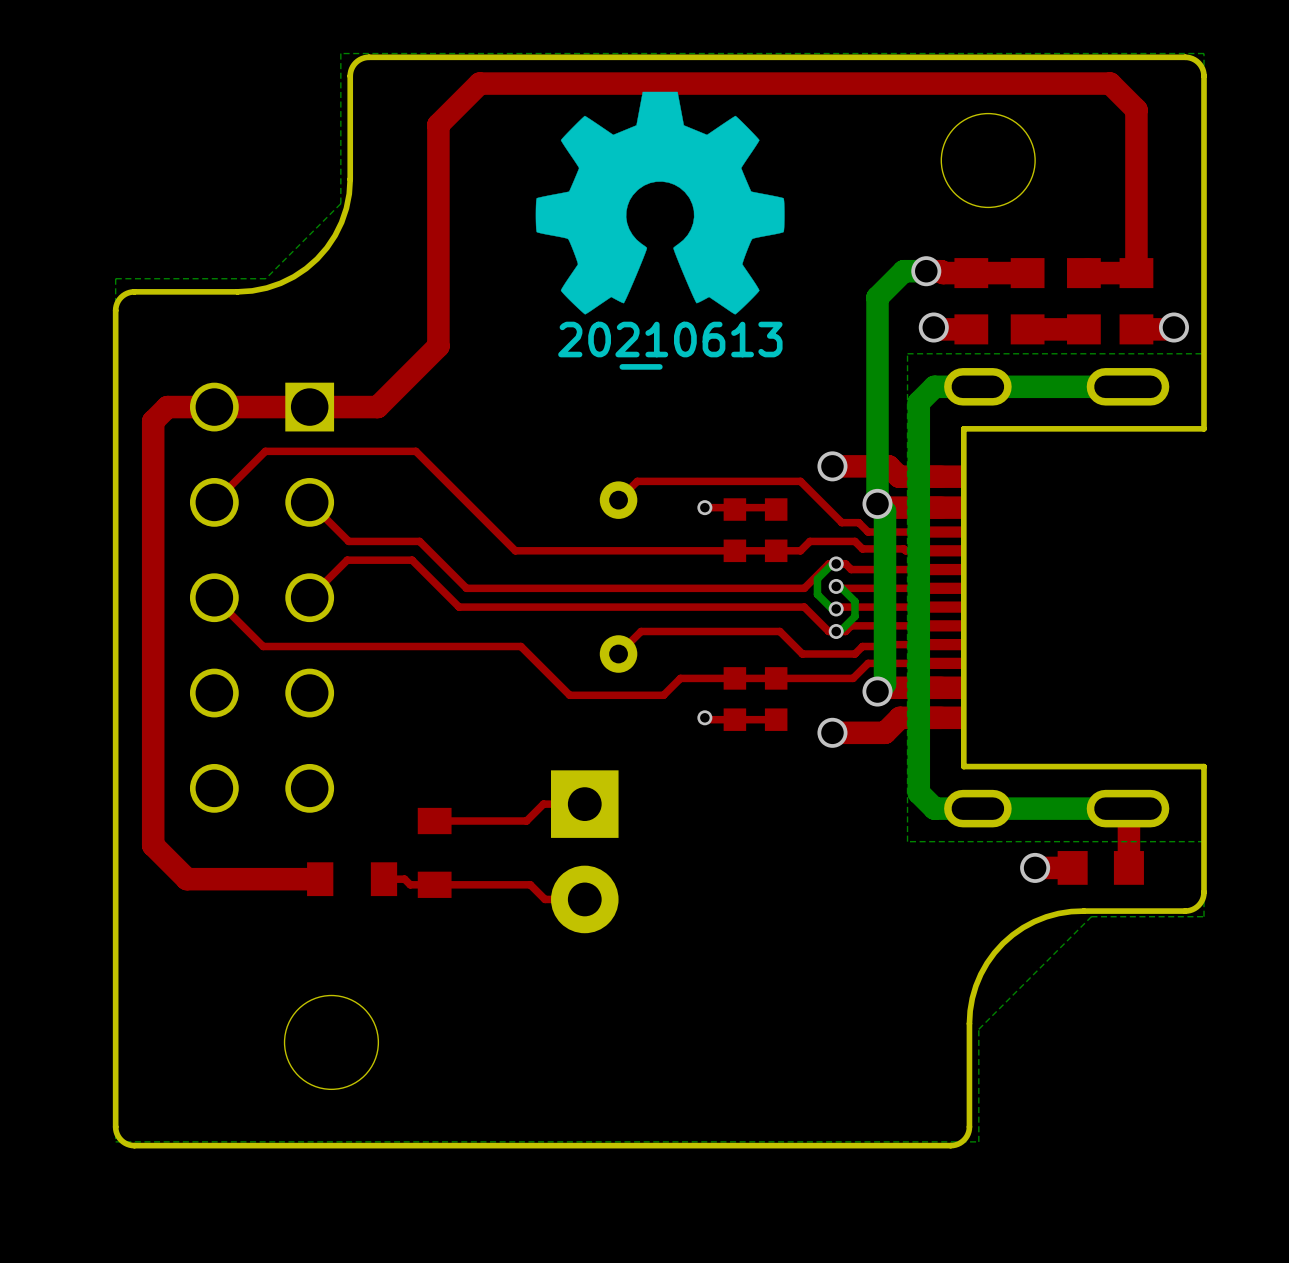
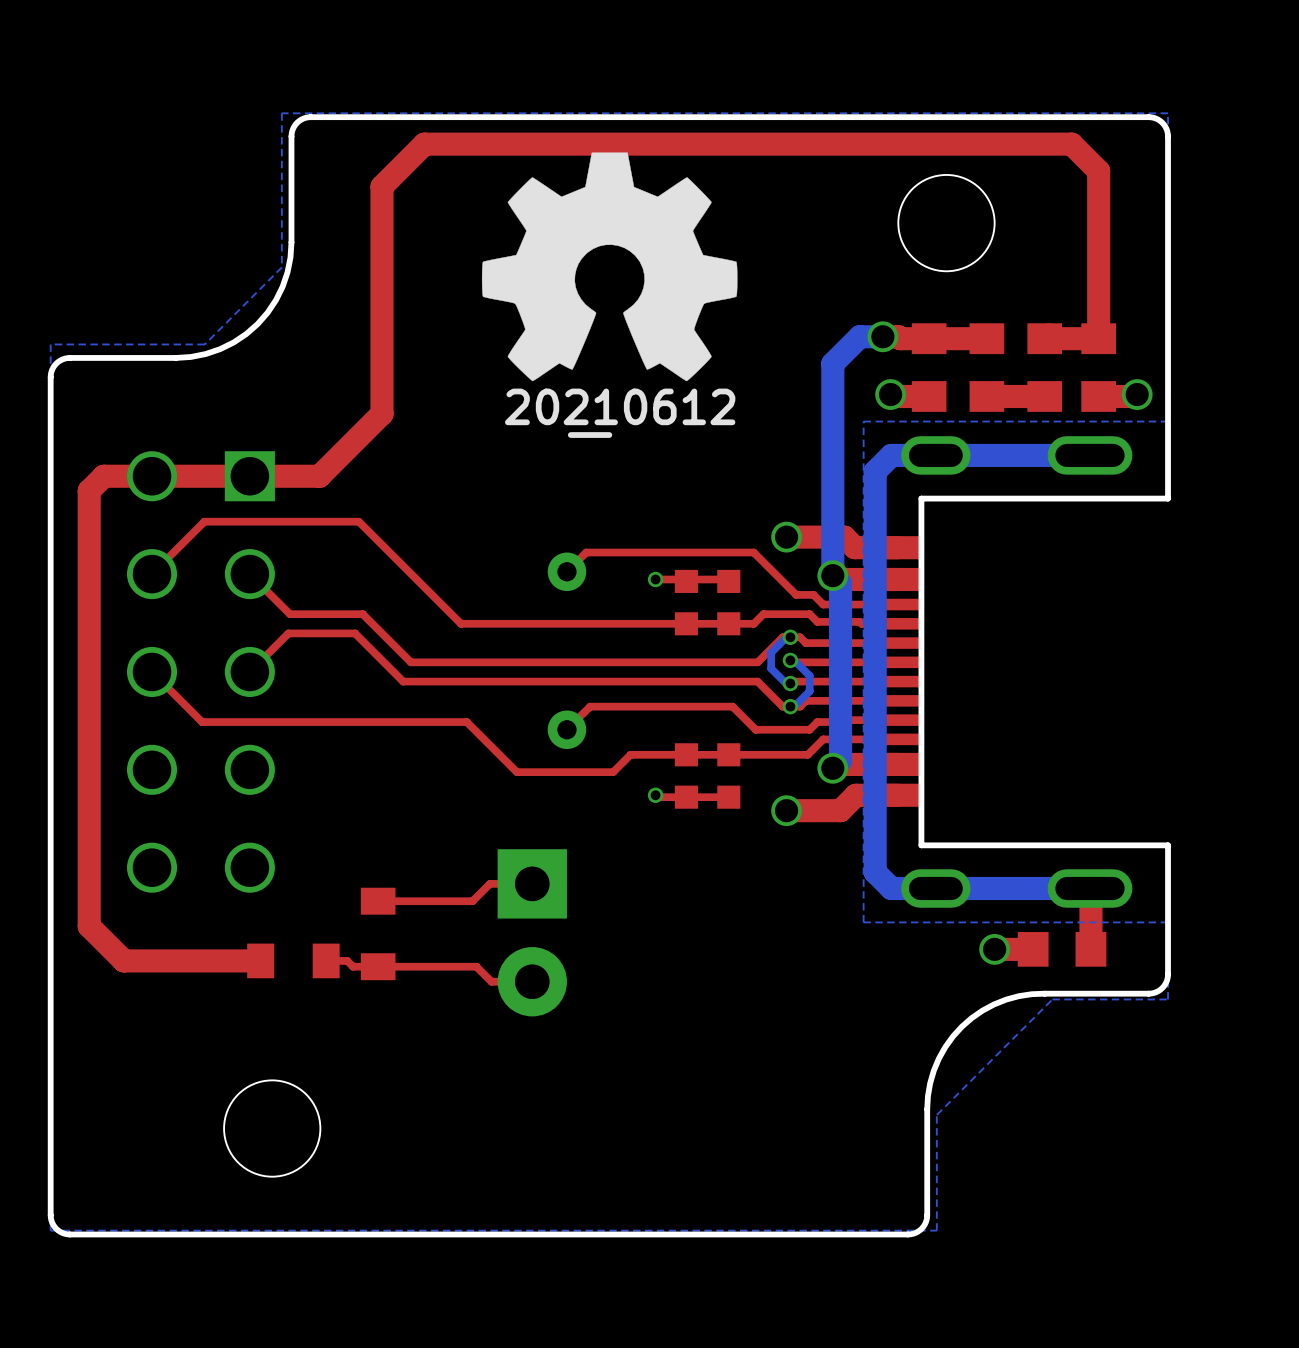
drawing shape: [558, 321, 783, 370] -> [505, 388, 736, 438]

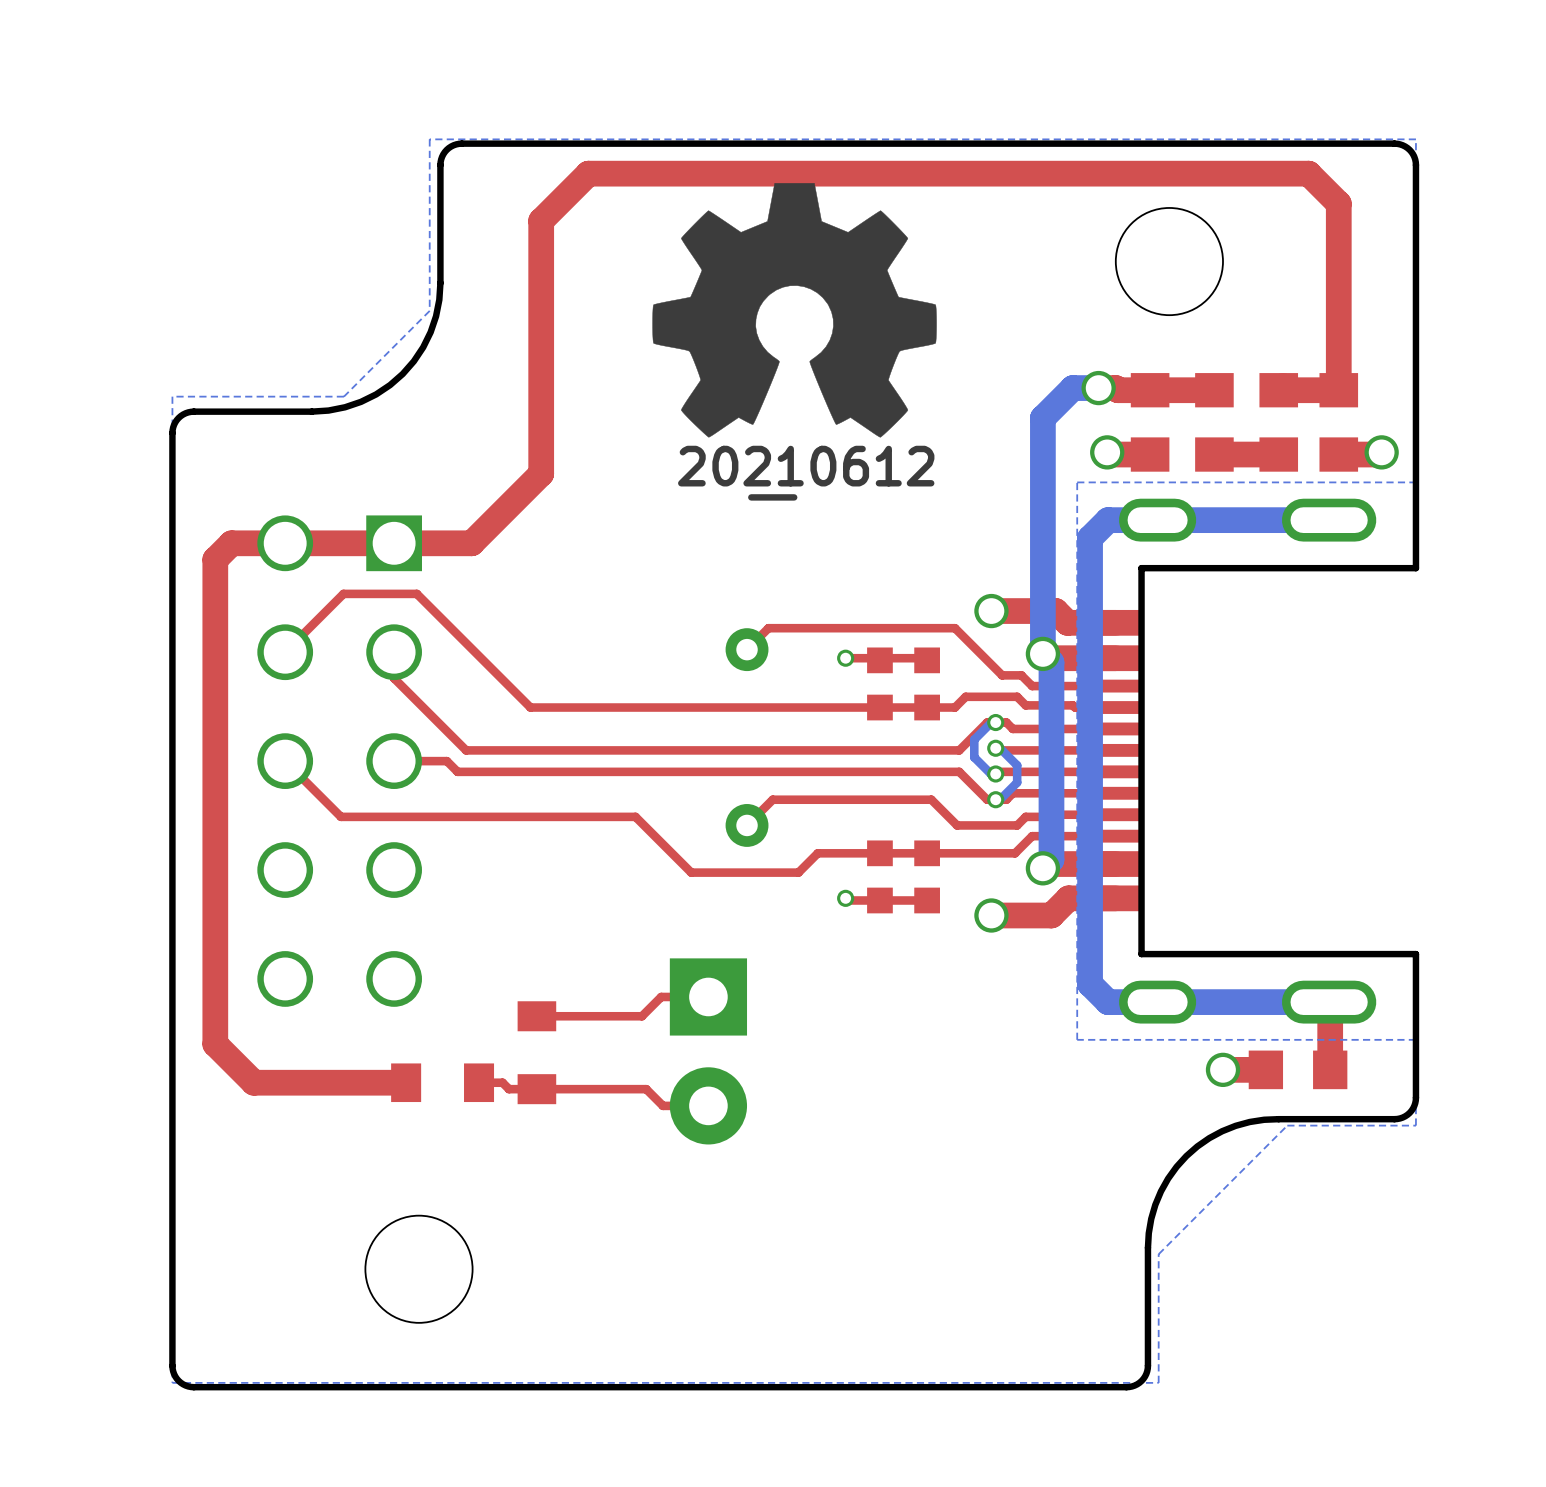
top track: (270, 521) (358, 521) (461, 623) -> none
top track: (249, 574) (289, 614) (362, 614) -> (416, 593) (519, 696)
top track: none -> (394, 652) (394, 678) (466, 750) (573, 750)
top track: (372, 623) (410, 662) -> (530, 707) (629, 707)
top track: (249, 671) (288, 633) (355, 633) (403, 681) -> (394, 761) (446, 761) (457, 771) (564, 771)

